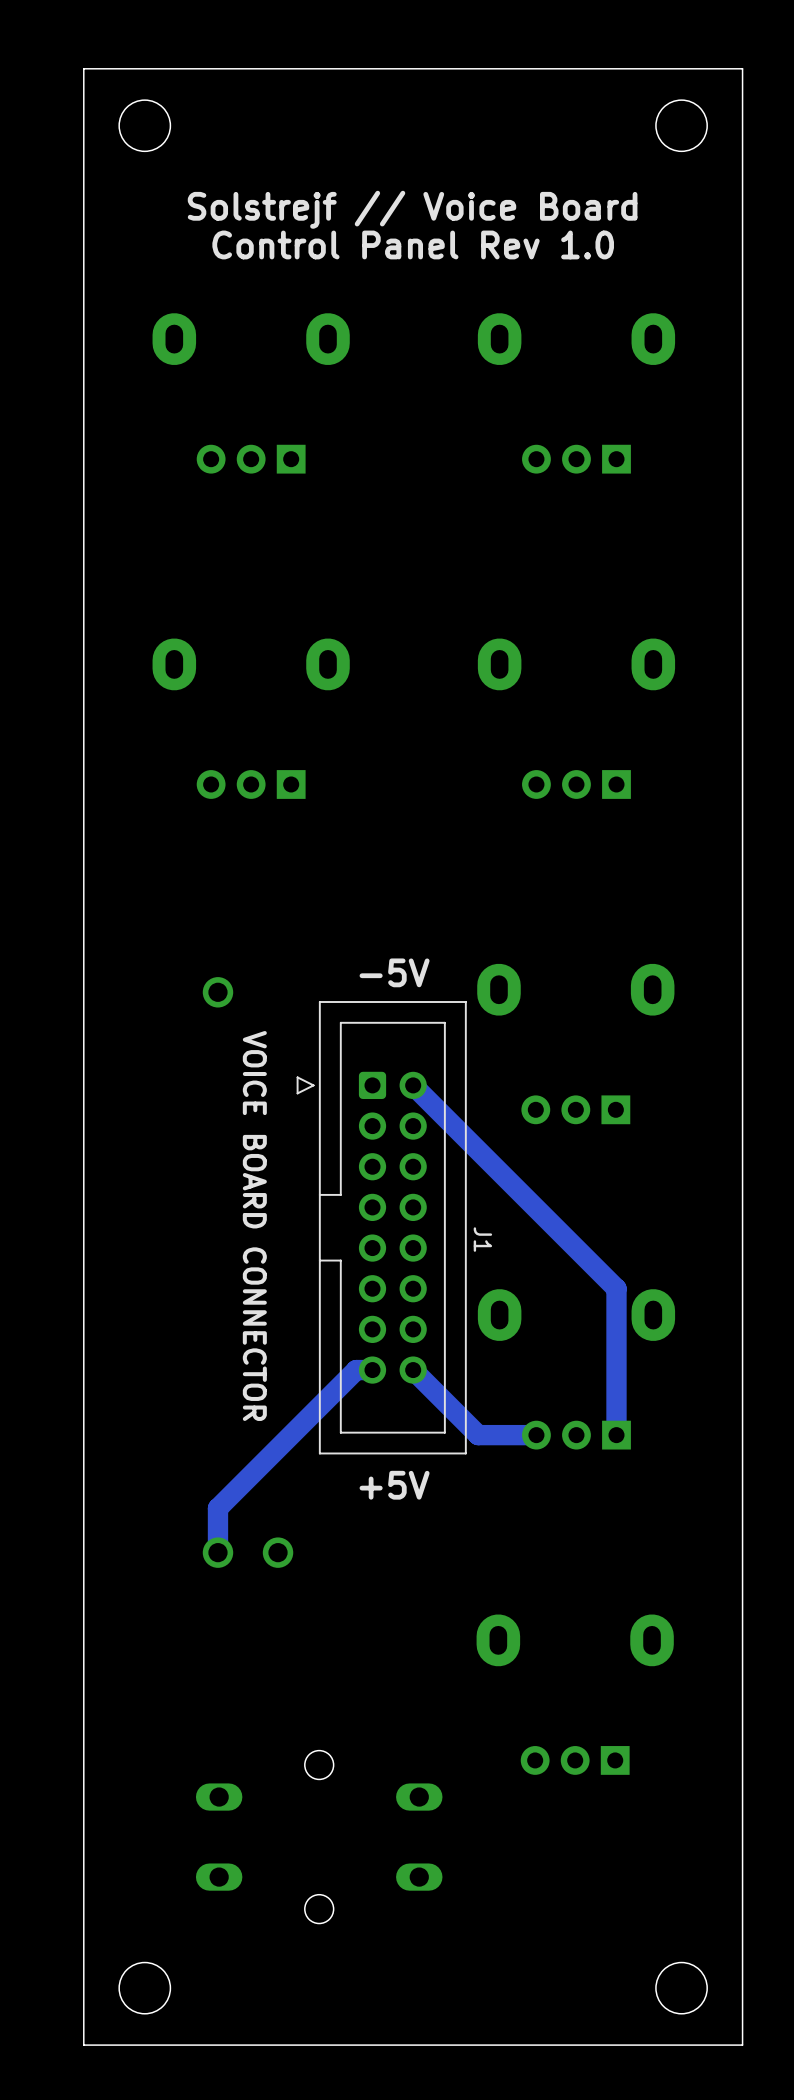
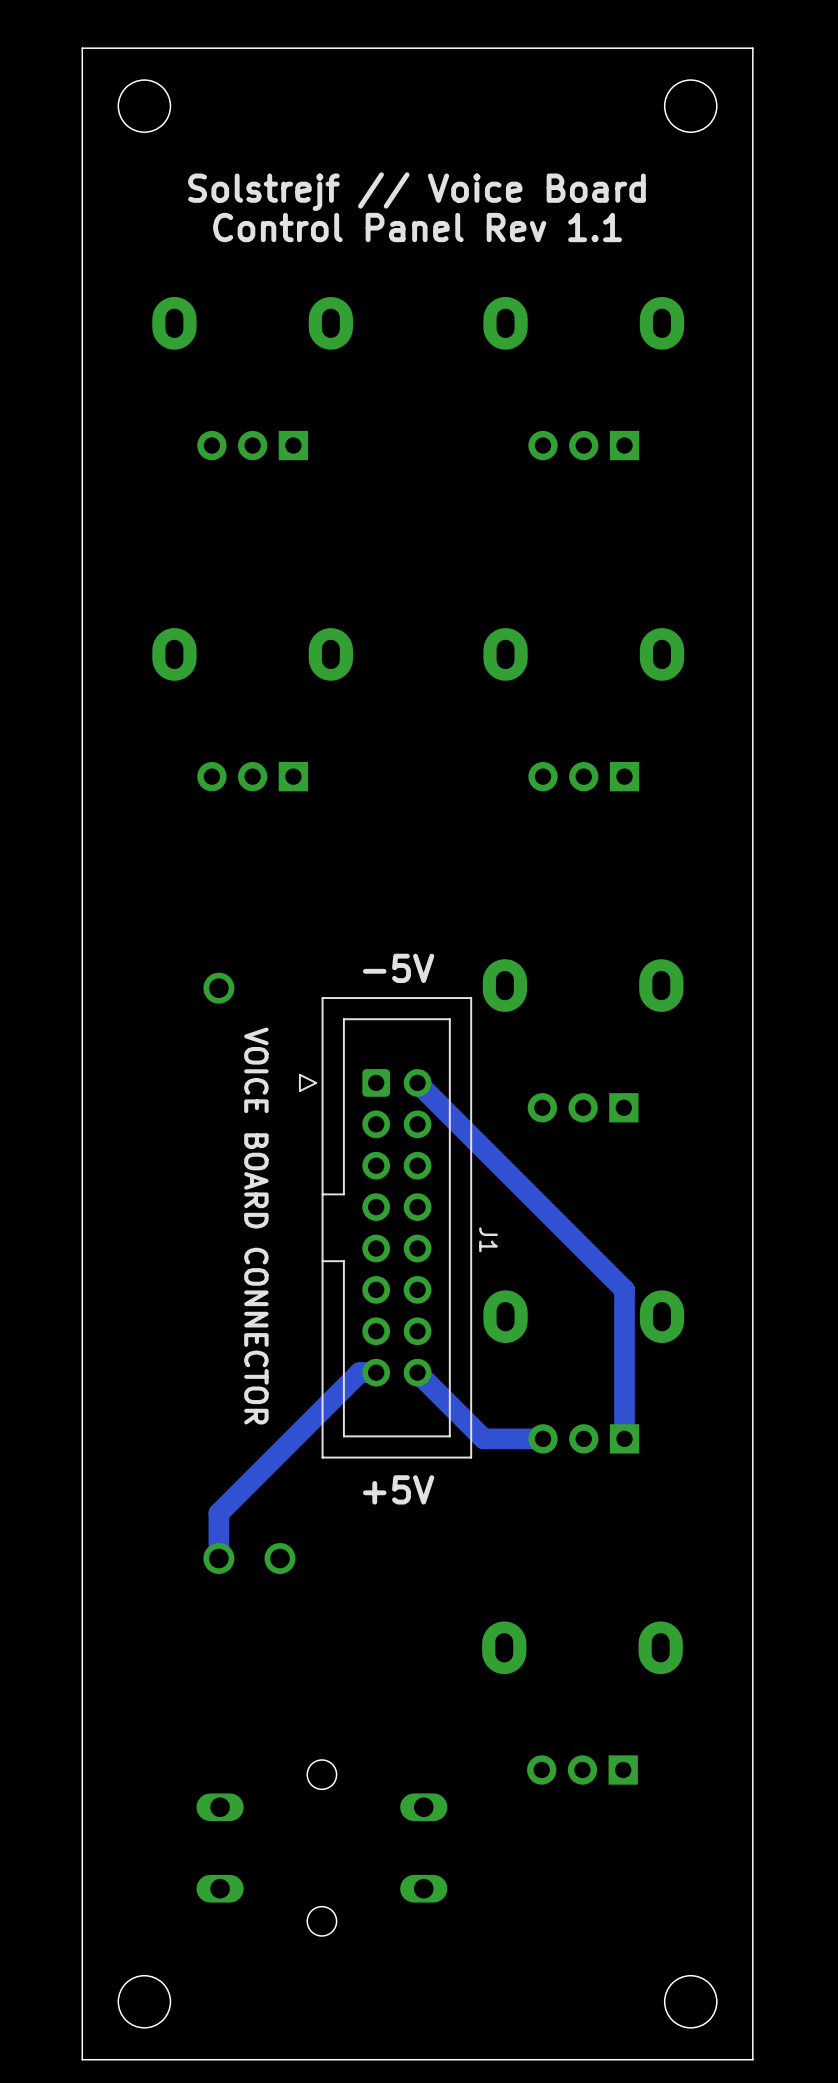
text: Control Panel Rev 1.0 (413, 244) -> Control Panel Rev 1.1 (417, 227)

